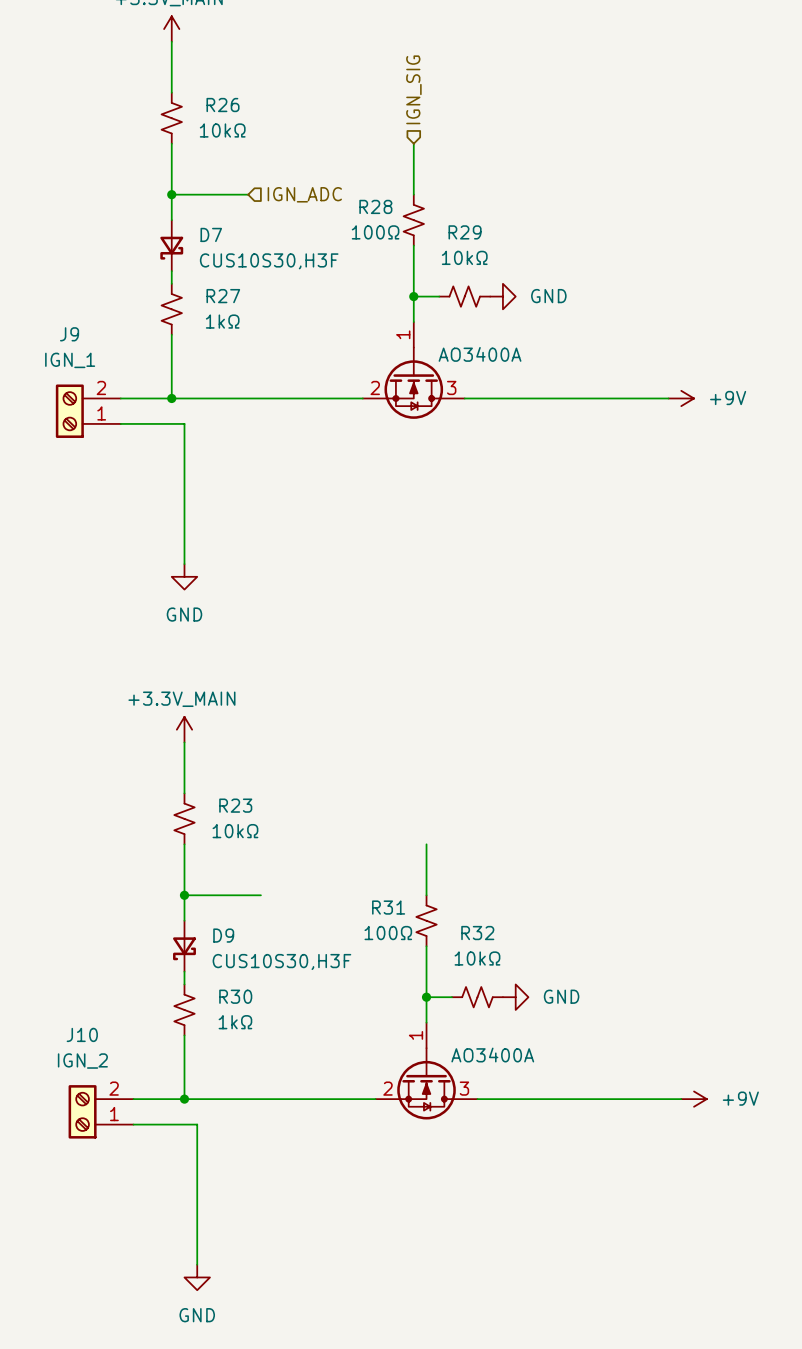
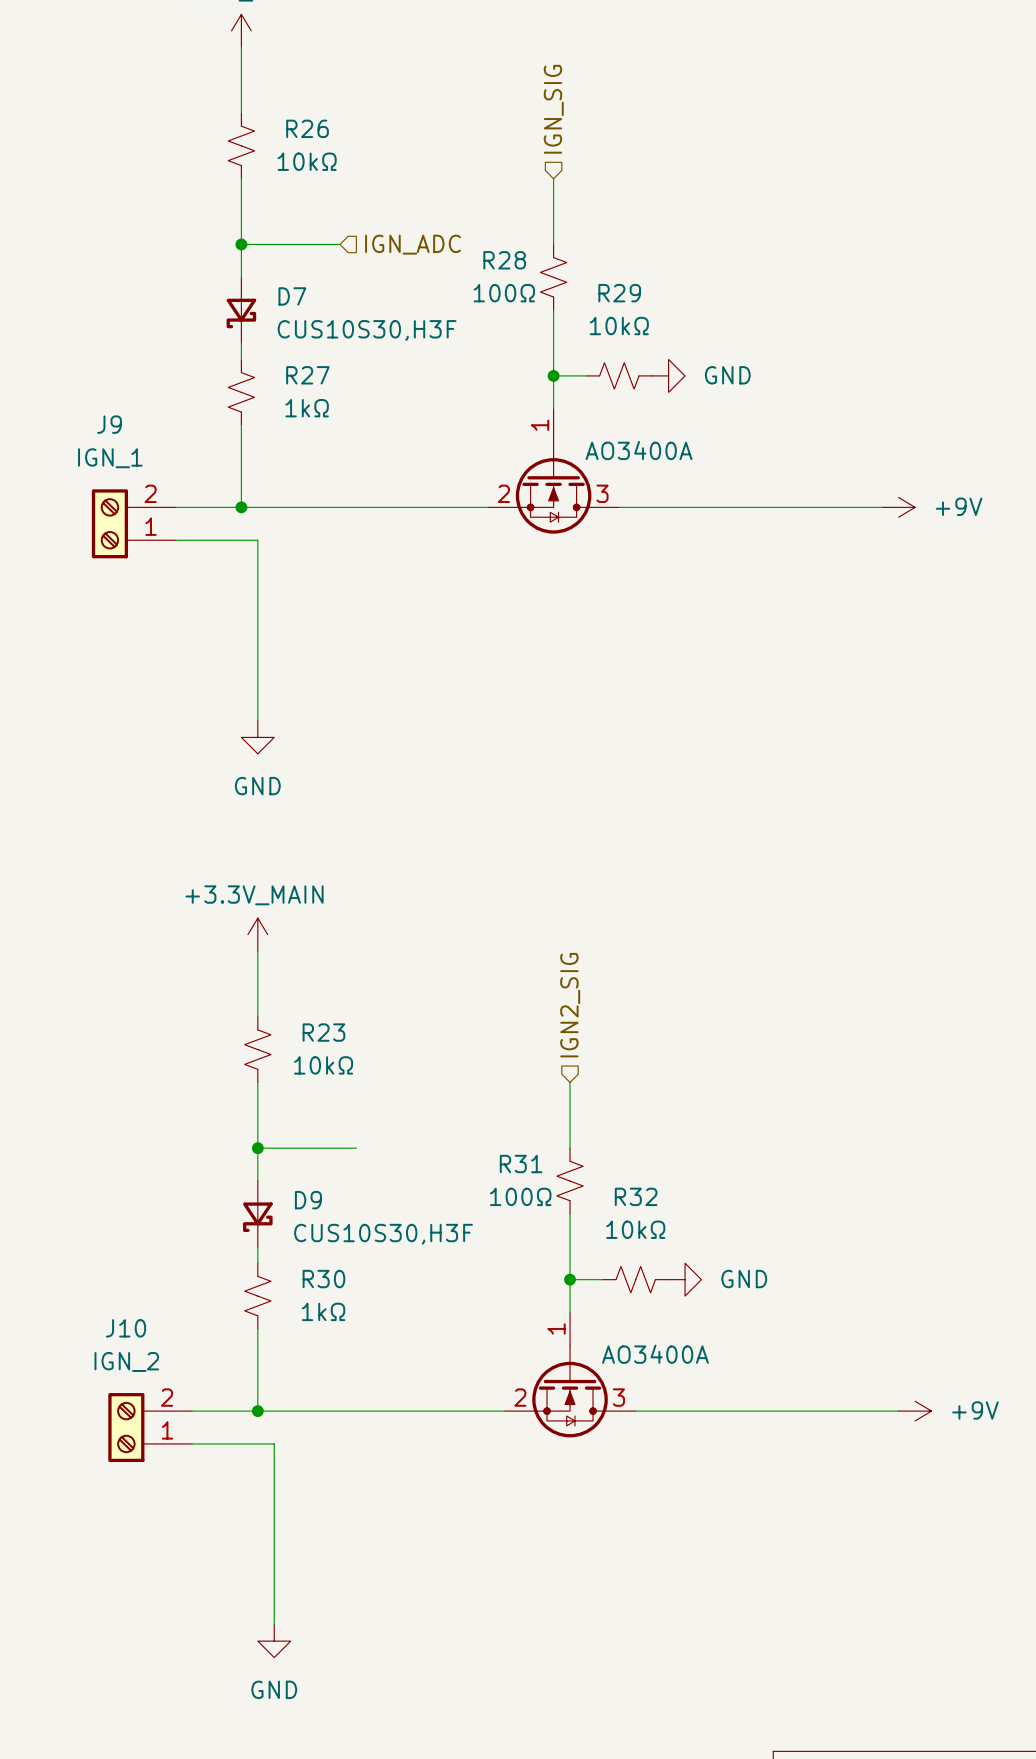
hierarchical label: none -> IGN2_SIG (570, 1005)

